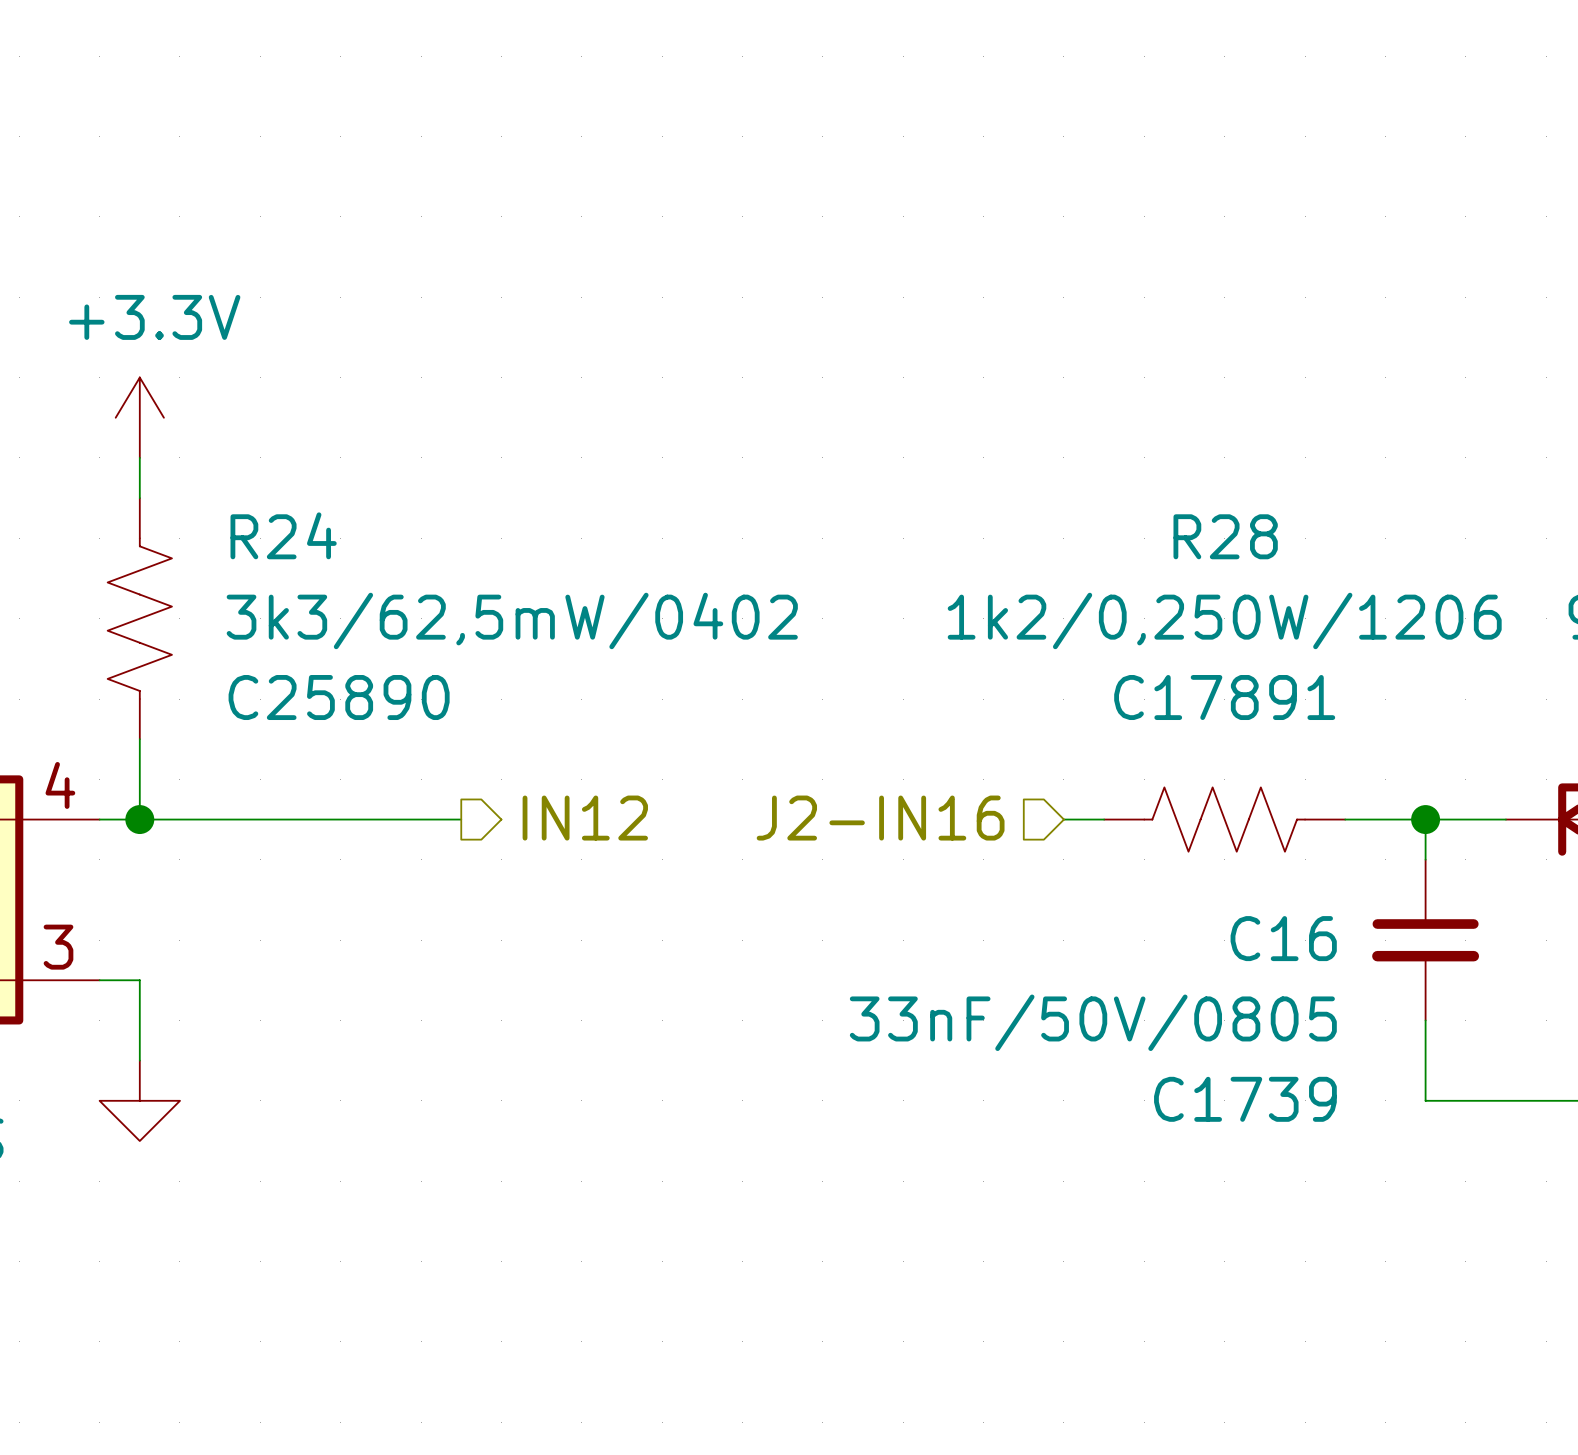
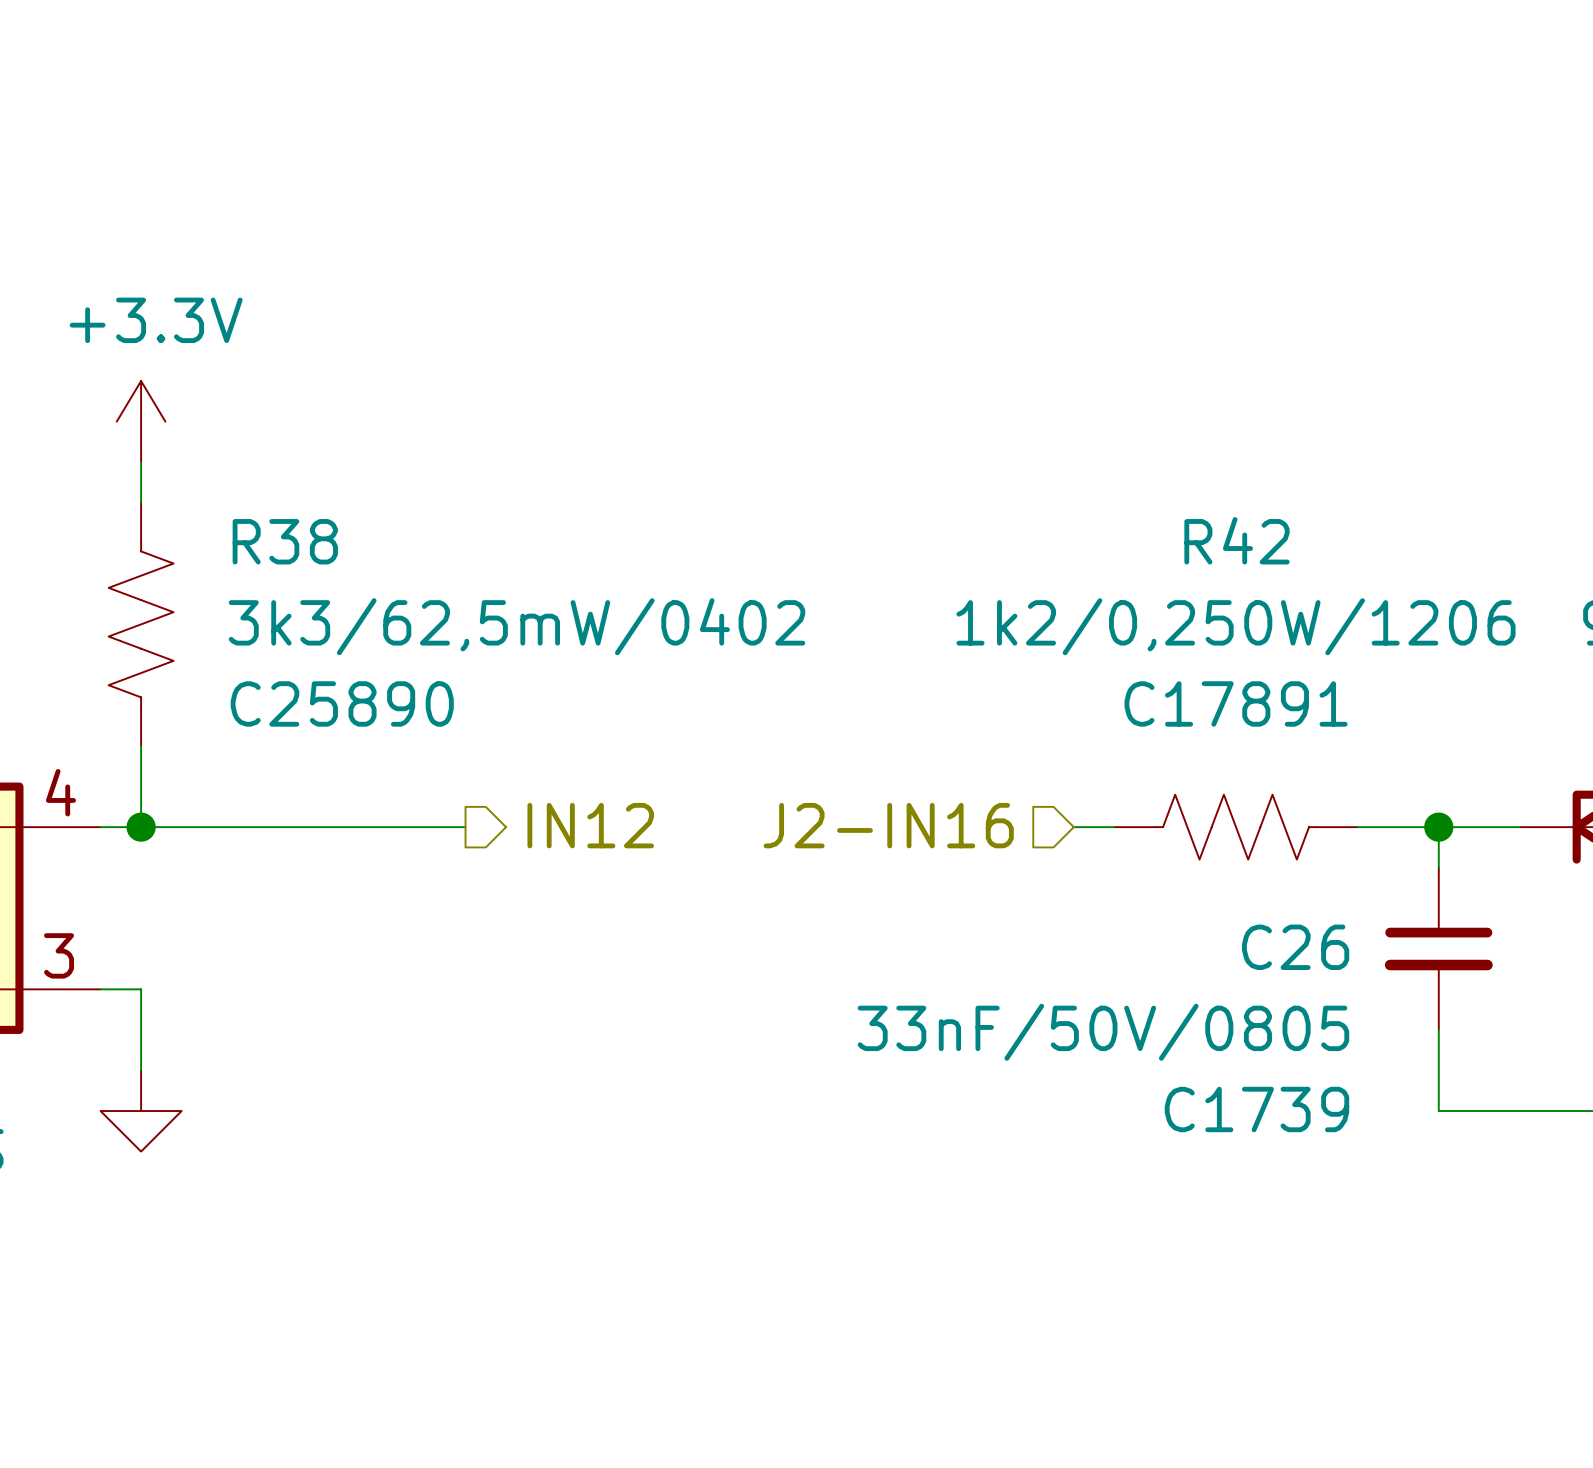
R24 name: R24 (283, 535) -> R38 (285, 541)
R28 name: R28 (1225, 536) -> R42 (1237, 540)
C16 name: C16 (1283, 938) -> C26 (1295, 947)

